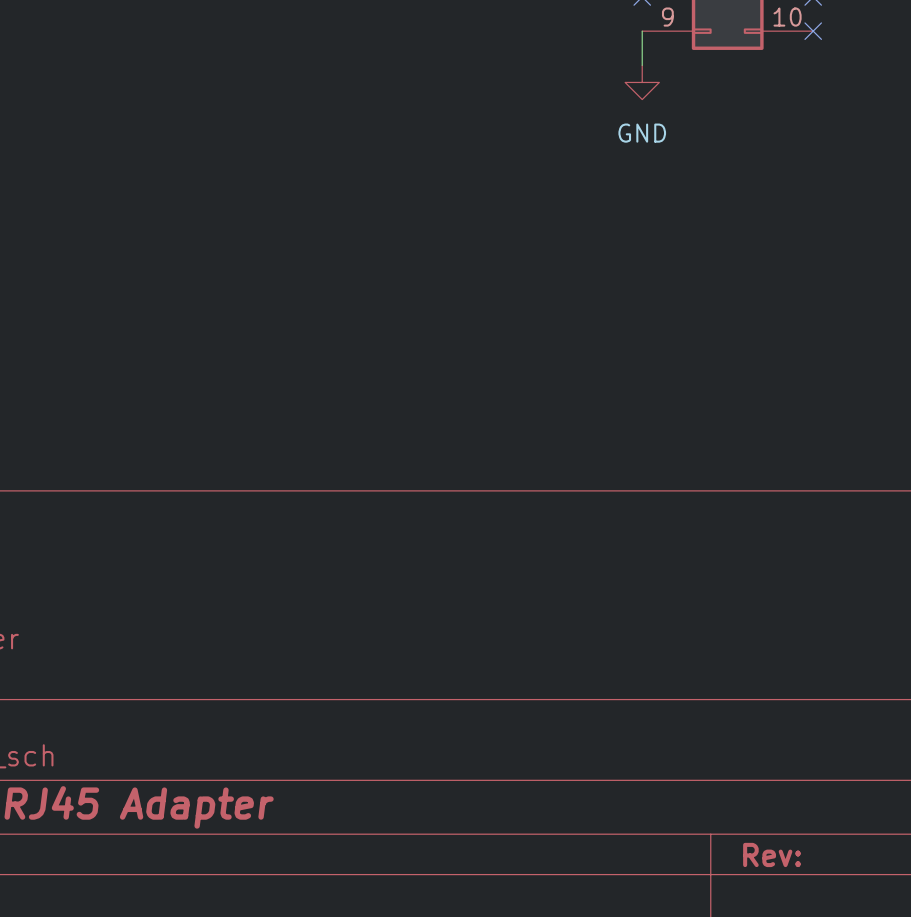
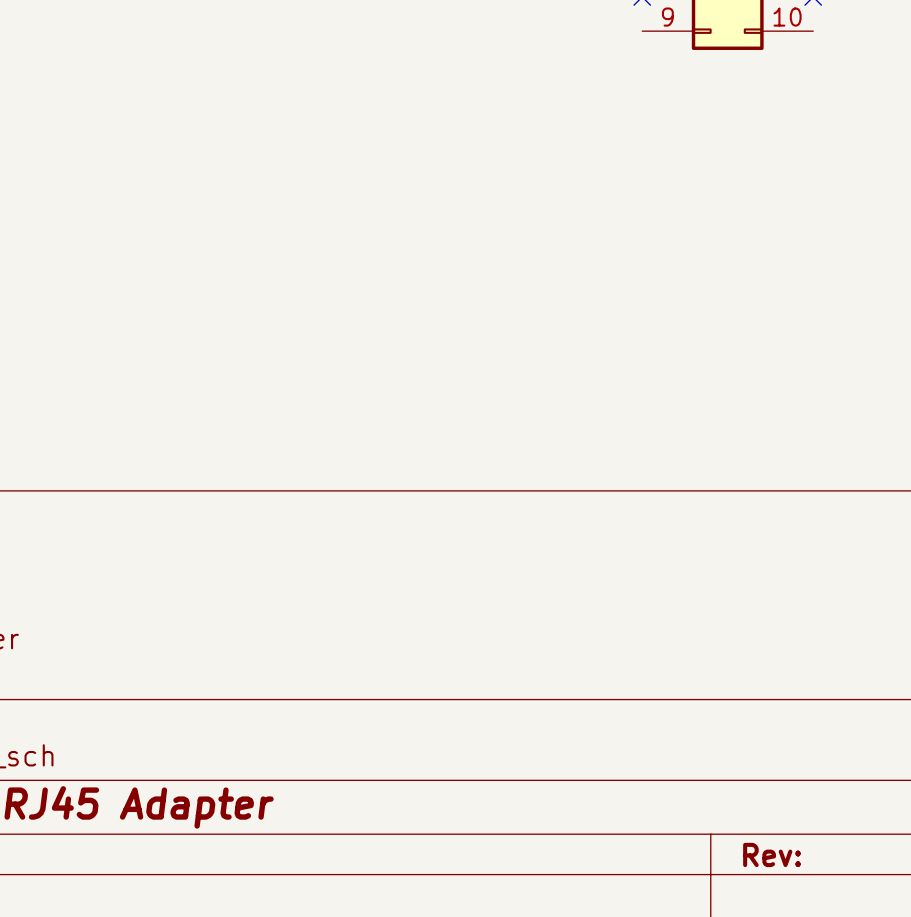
wire: (642, 31) (642, 65) -> none
no-connect mark: (813, 31) -> none
power symbol: GND (642, 82) -> none

